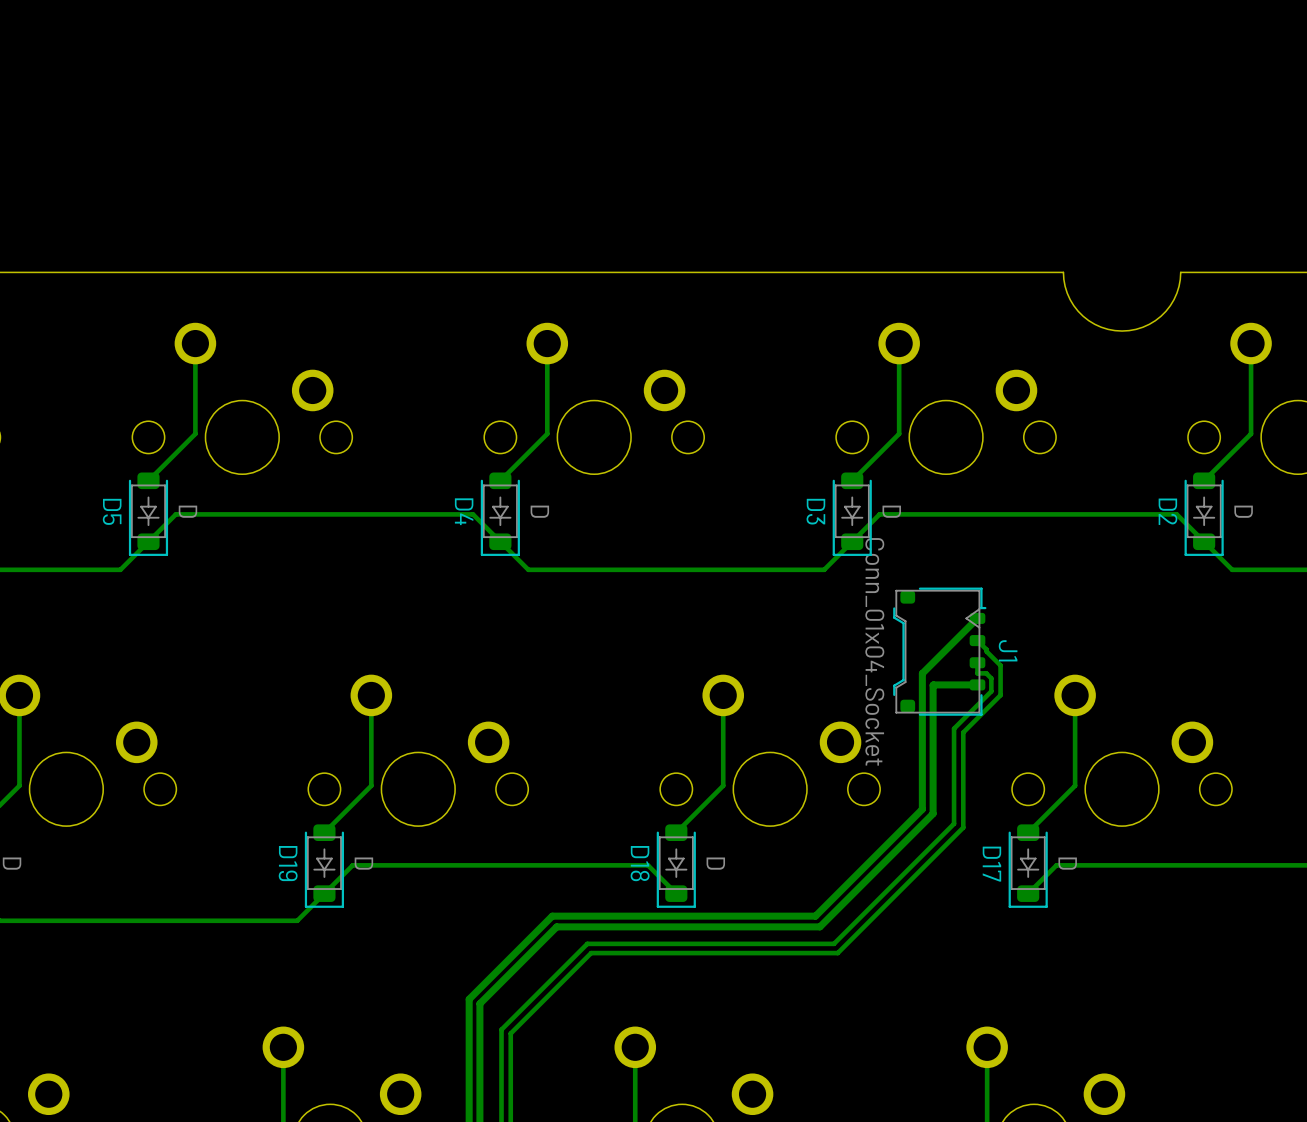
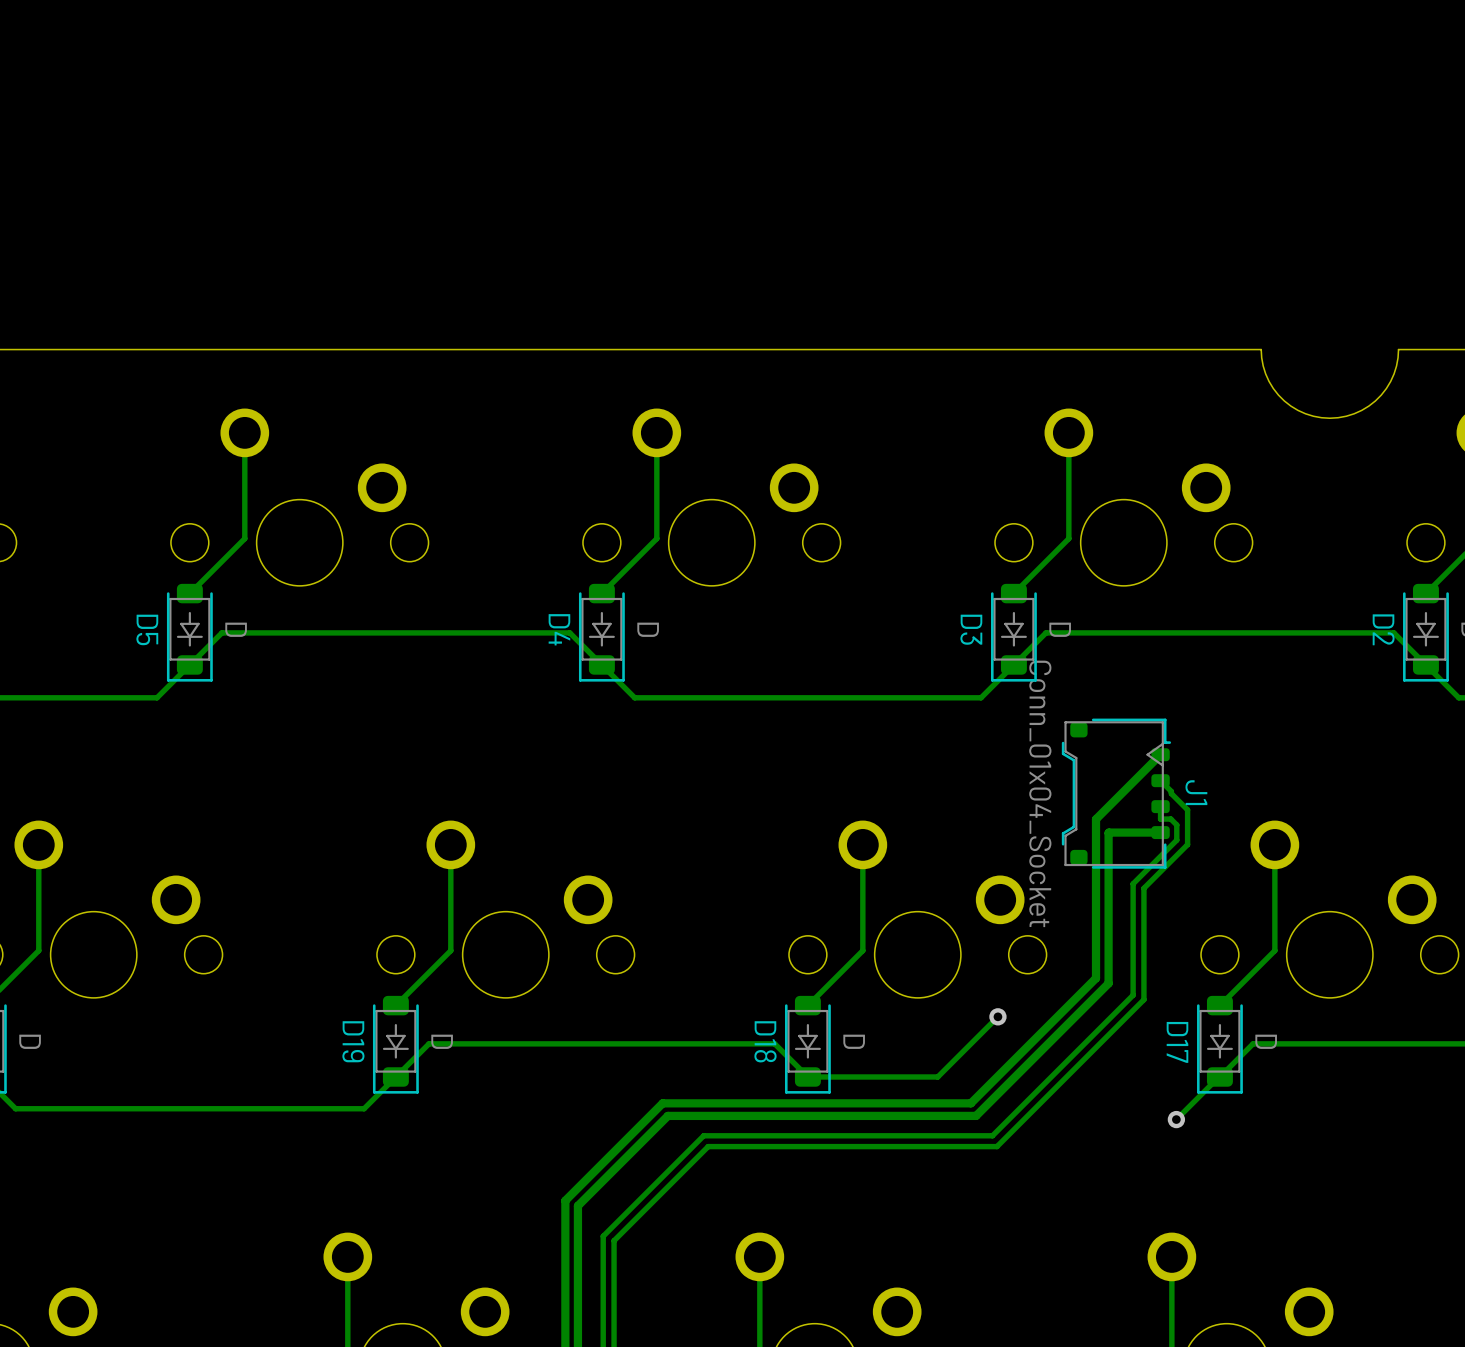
track: none -> (997, 1016) (937, 1076) (807, 1076)
via: none -> (997, 1016)
track: none -> (1219, 1076) (1176, 1119)
via: none -> (1176, 1119)

